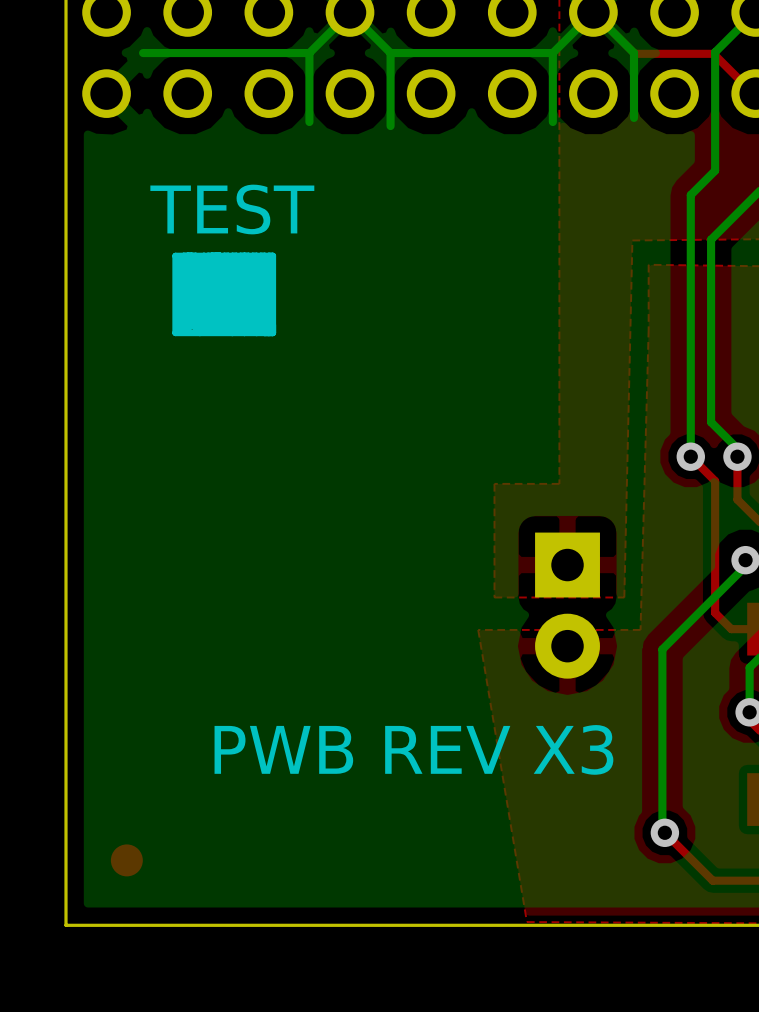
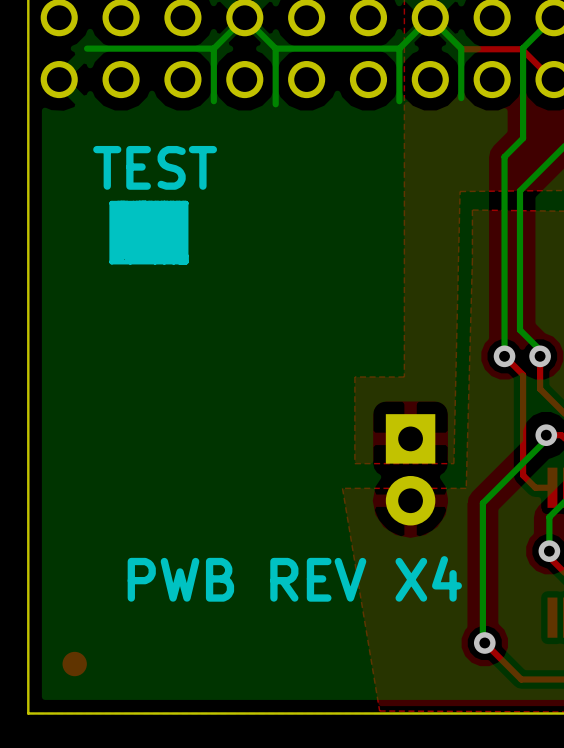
text: PWB REV X3 (413, 749) -> PWB REV X4 (294, 578)

